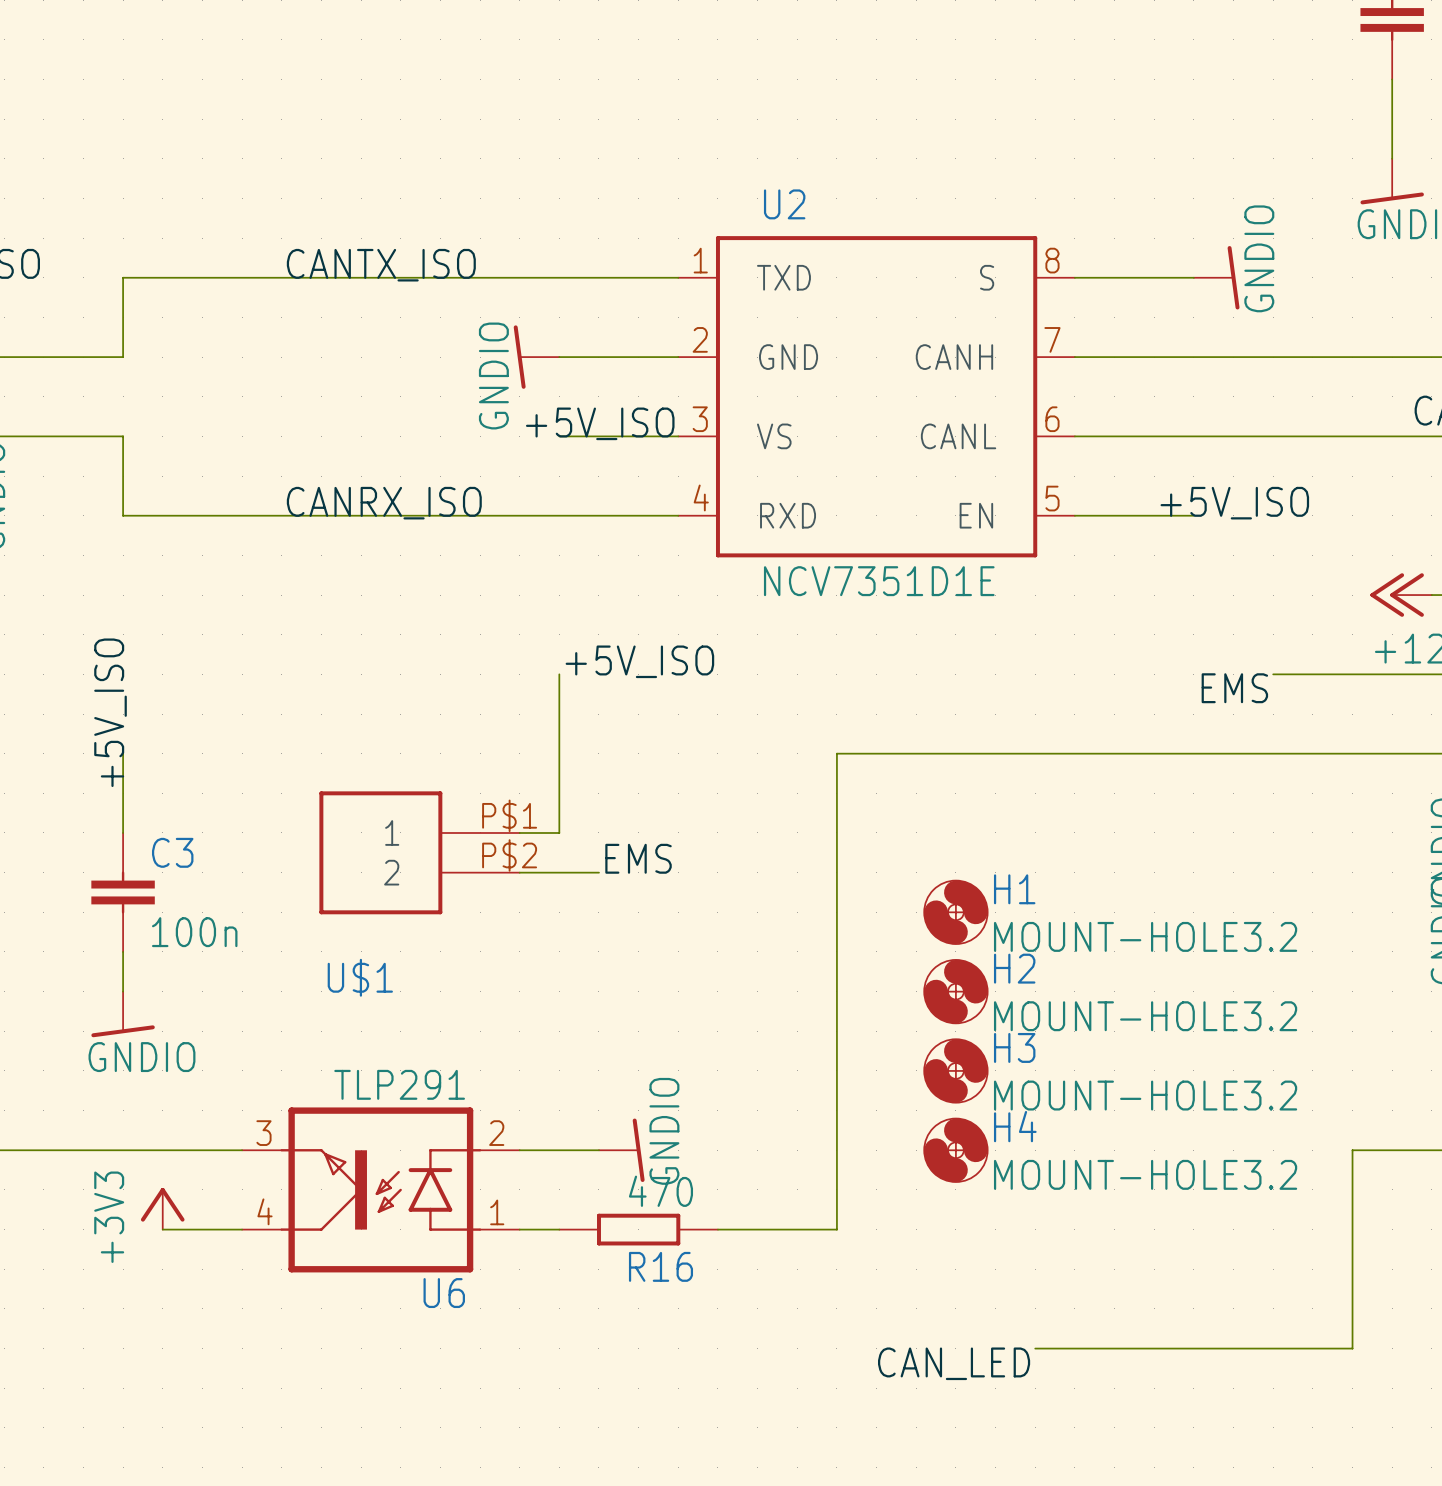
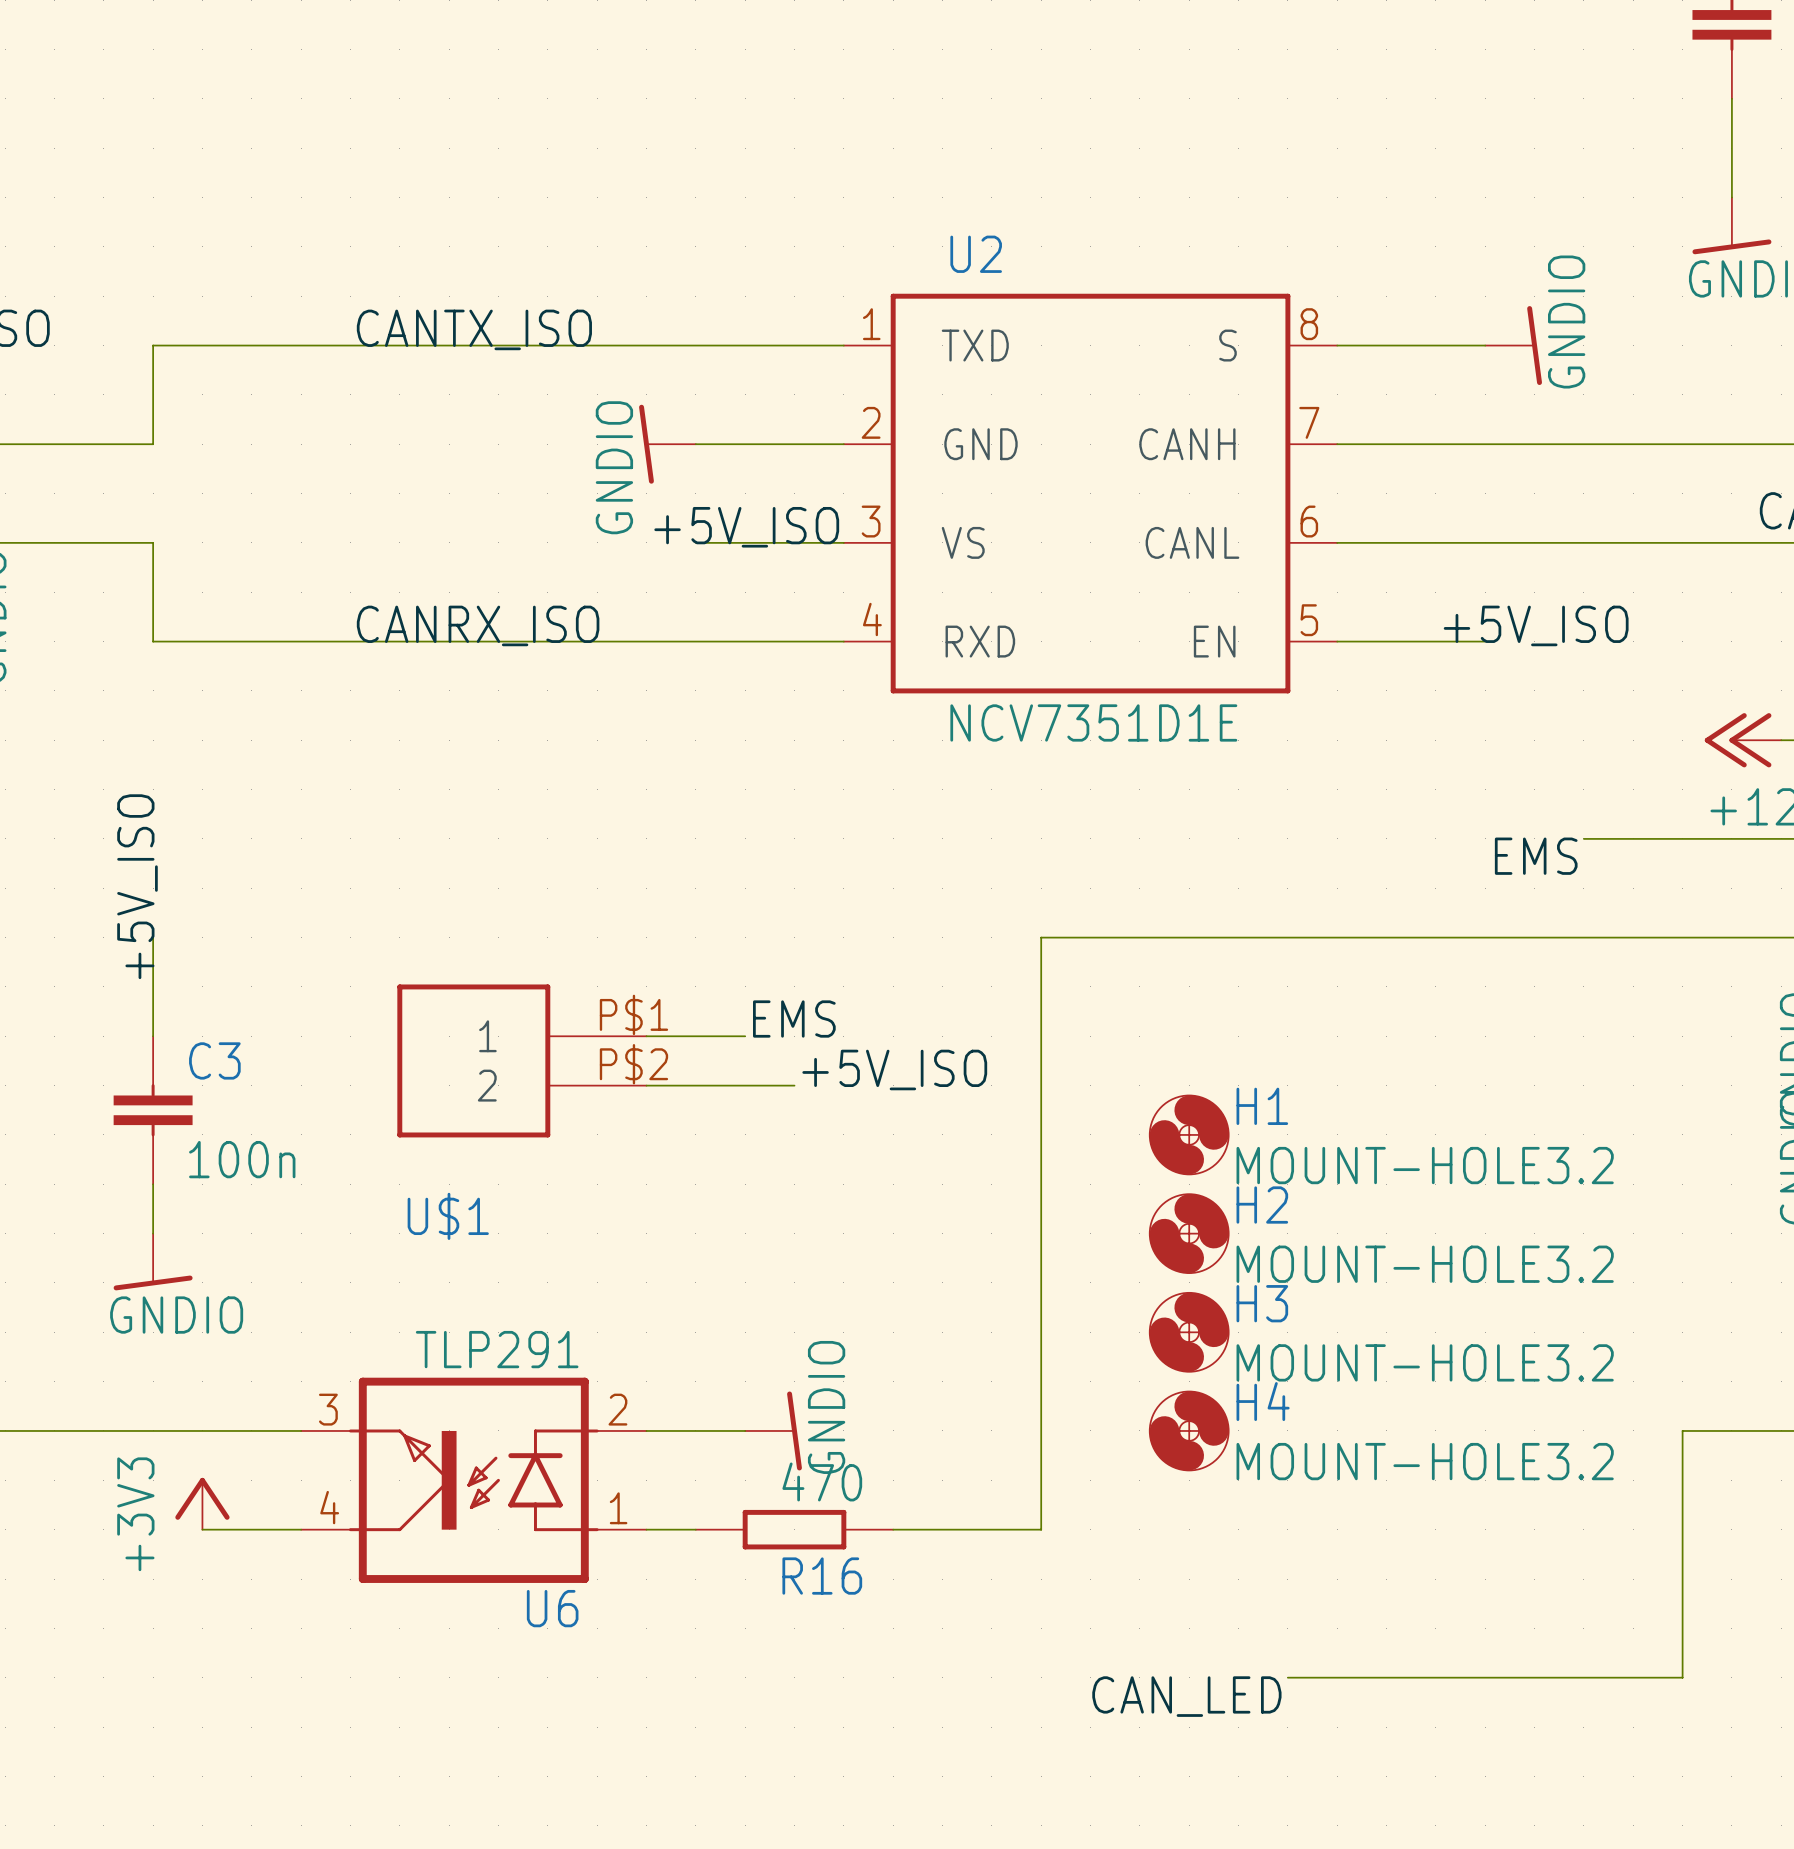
label position: +5V_ISO (639, 661) -> +5V_ISO (894, 1069)
wire: (559, 674) (559, 832) -> (745, 1036) (695, 1036)
label position: EMS (638, 858) -> EMS (794, 1019)
wire: none -> (745, 1085) (794, 1085)

